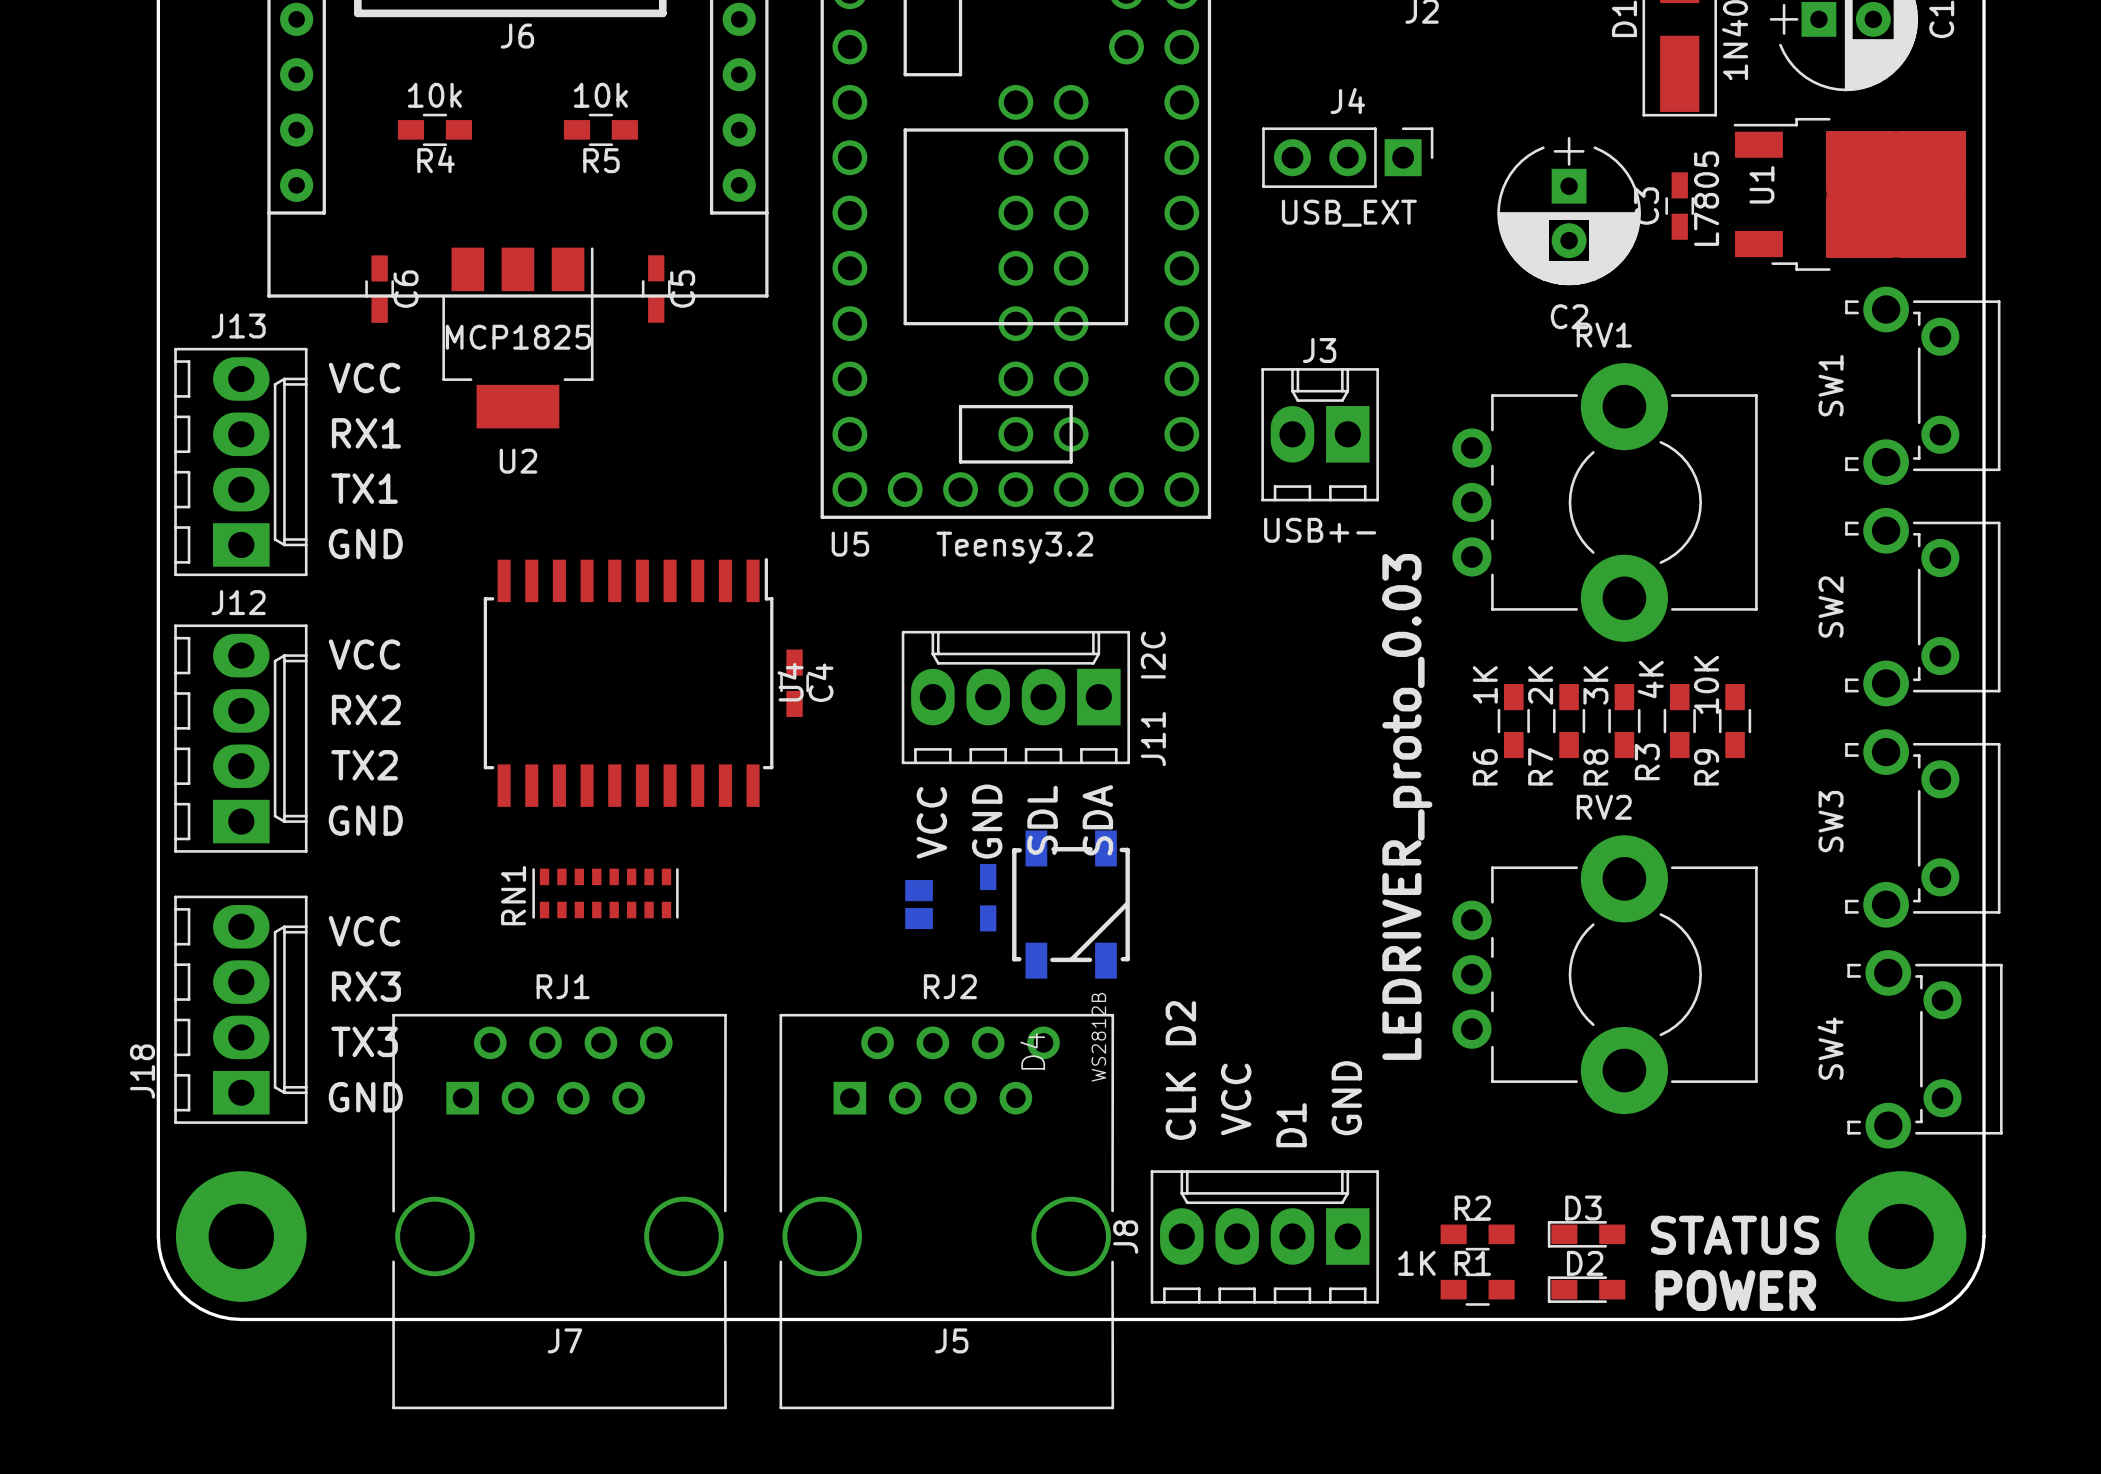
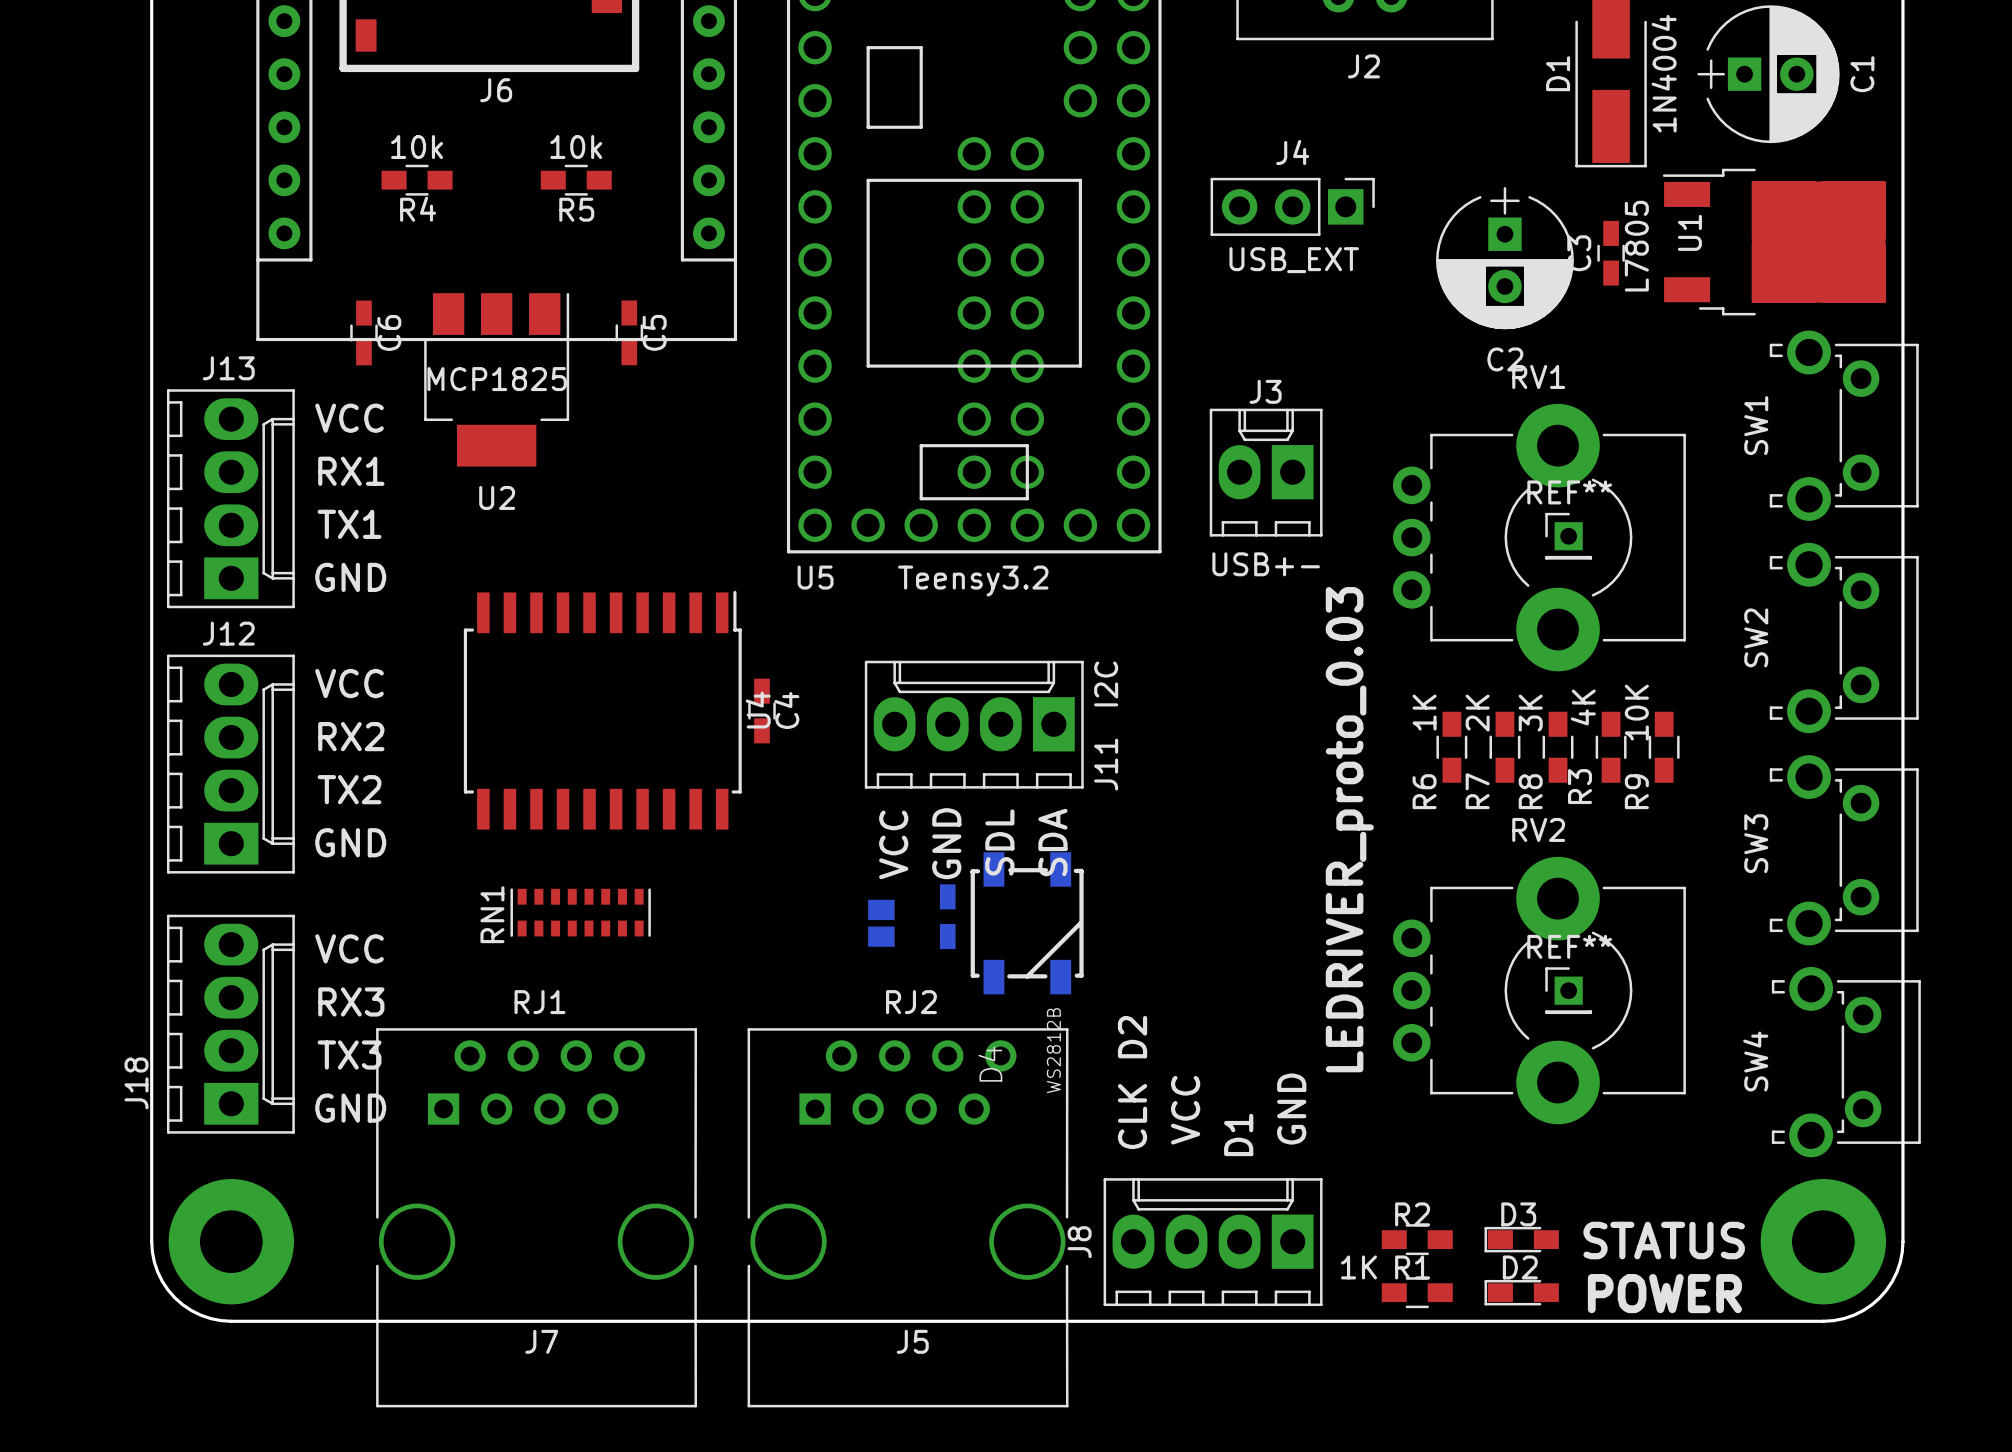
REF**: none -> (1568, 536)
REF**: none -> (1568, 990)

